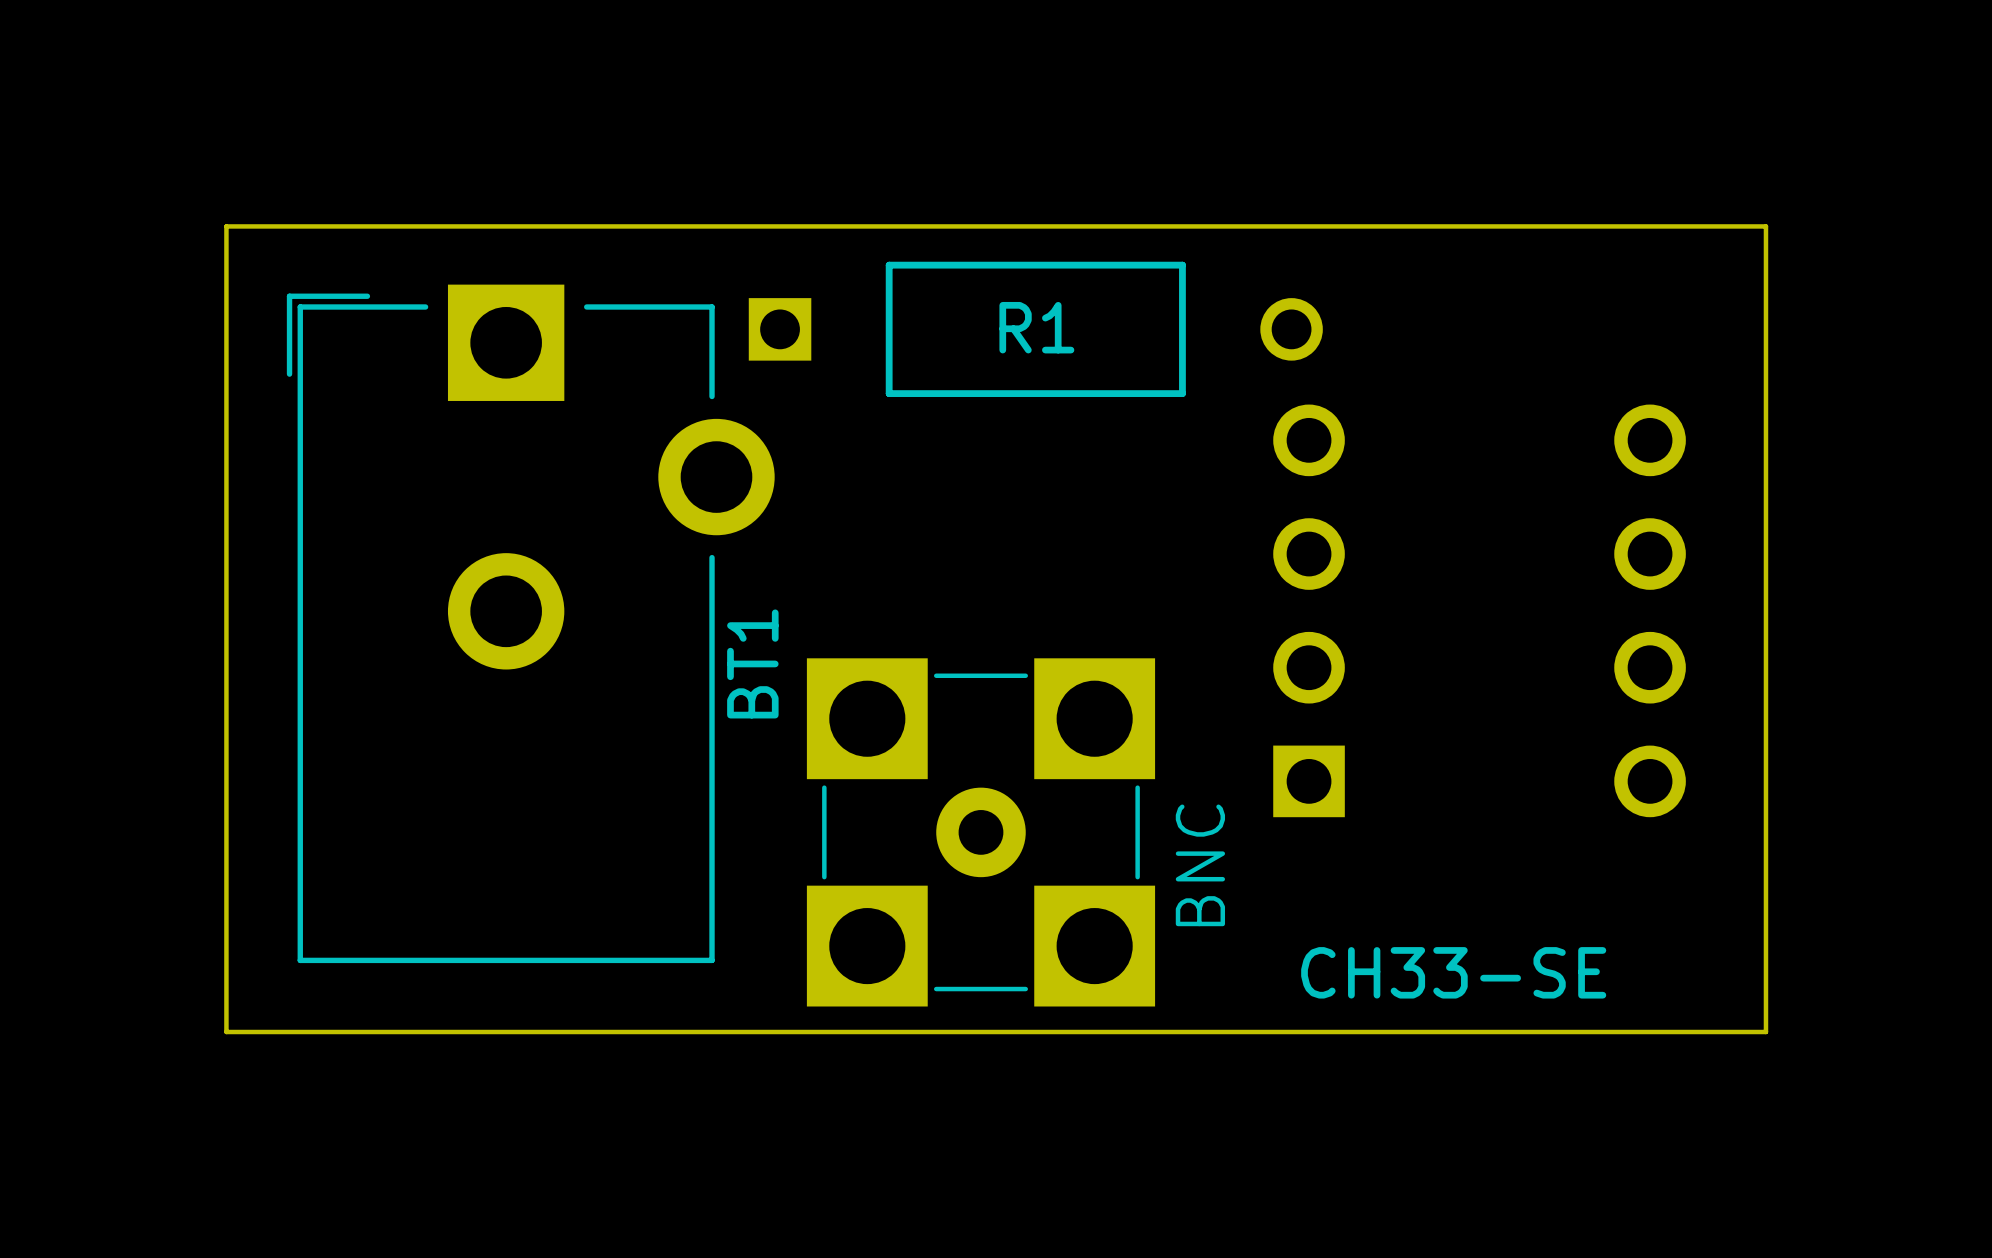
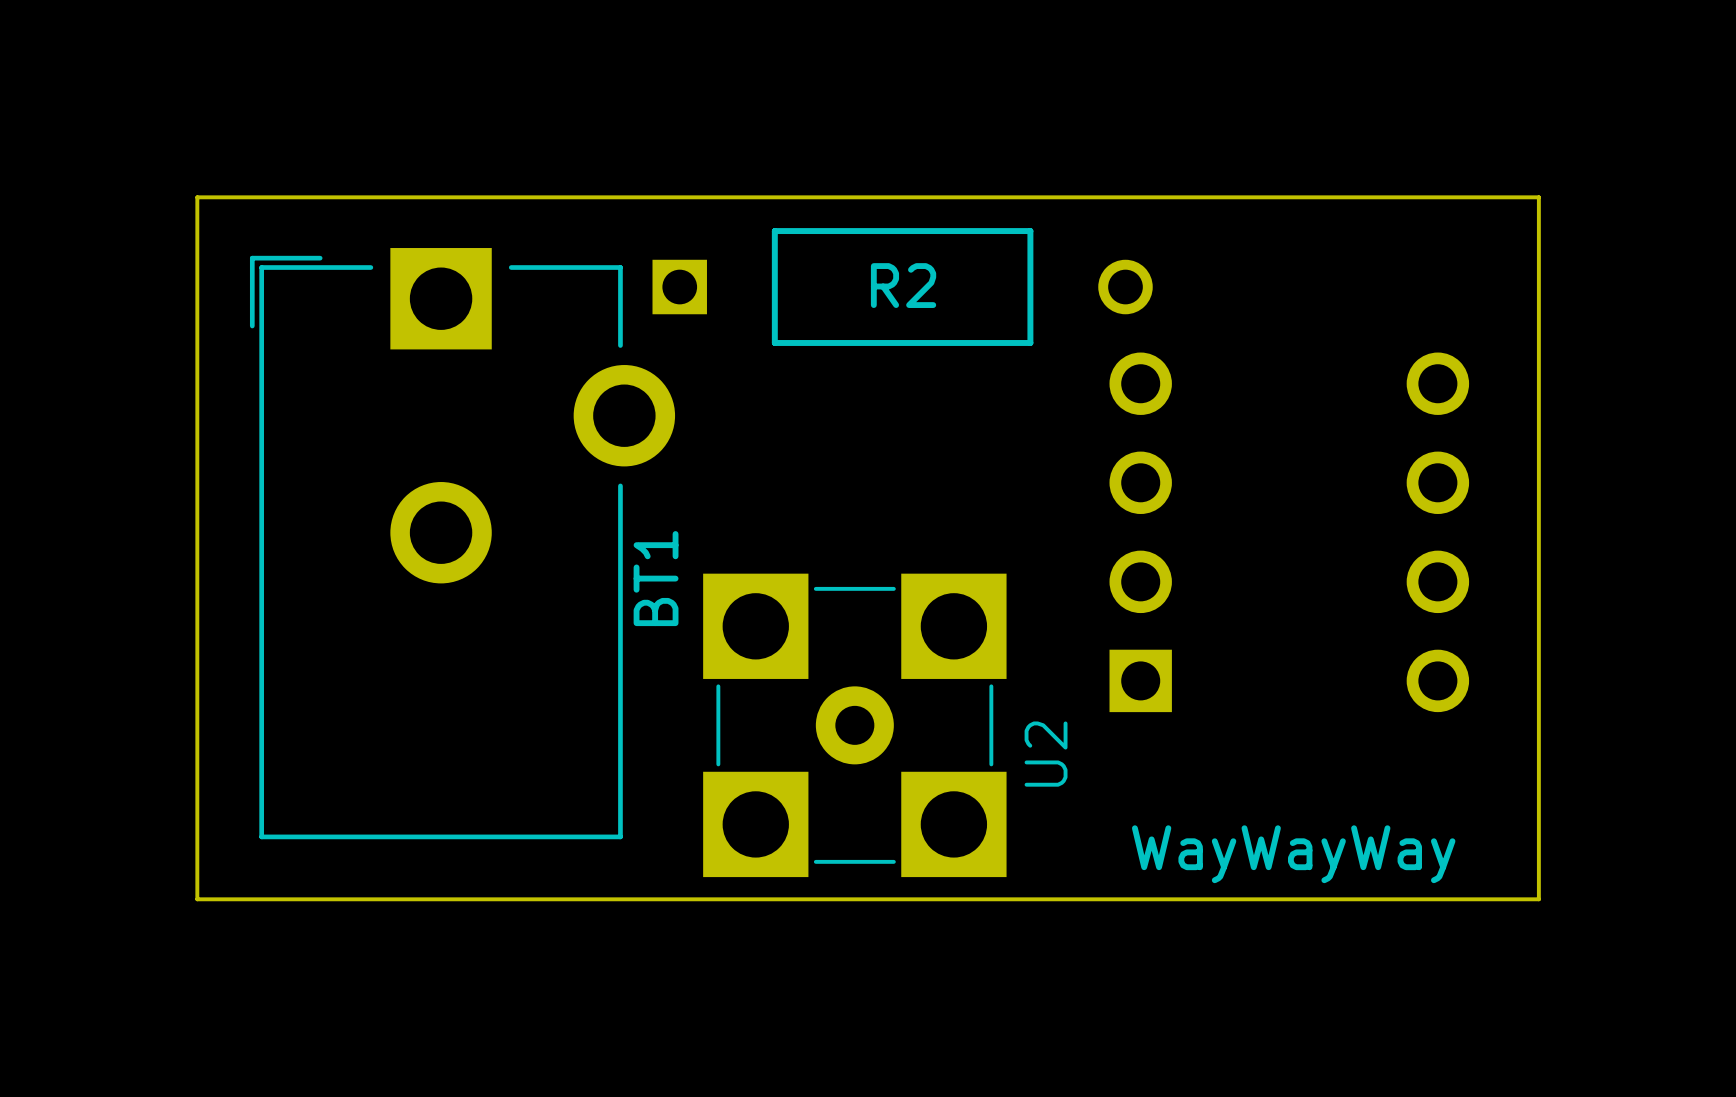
R1 name: R1 (1036, 327) -> R2 (903, 285)
BNC name: BNC (1200, 865) -> U2 (1046, 754)
text: CH33-SE (1453, 972) -> WayWayWay (1293, 854)

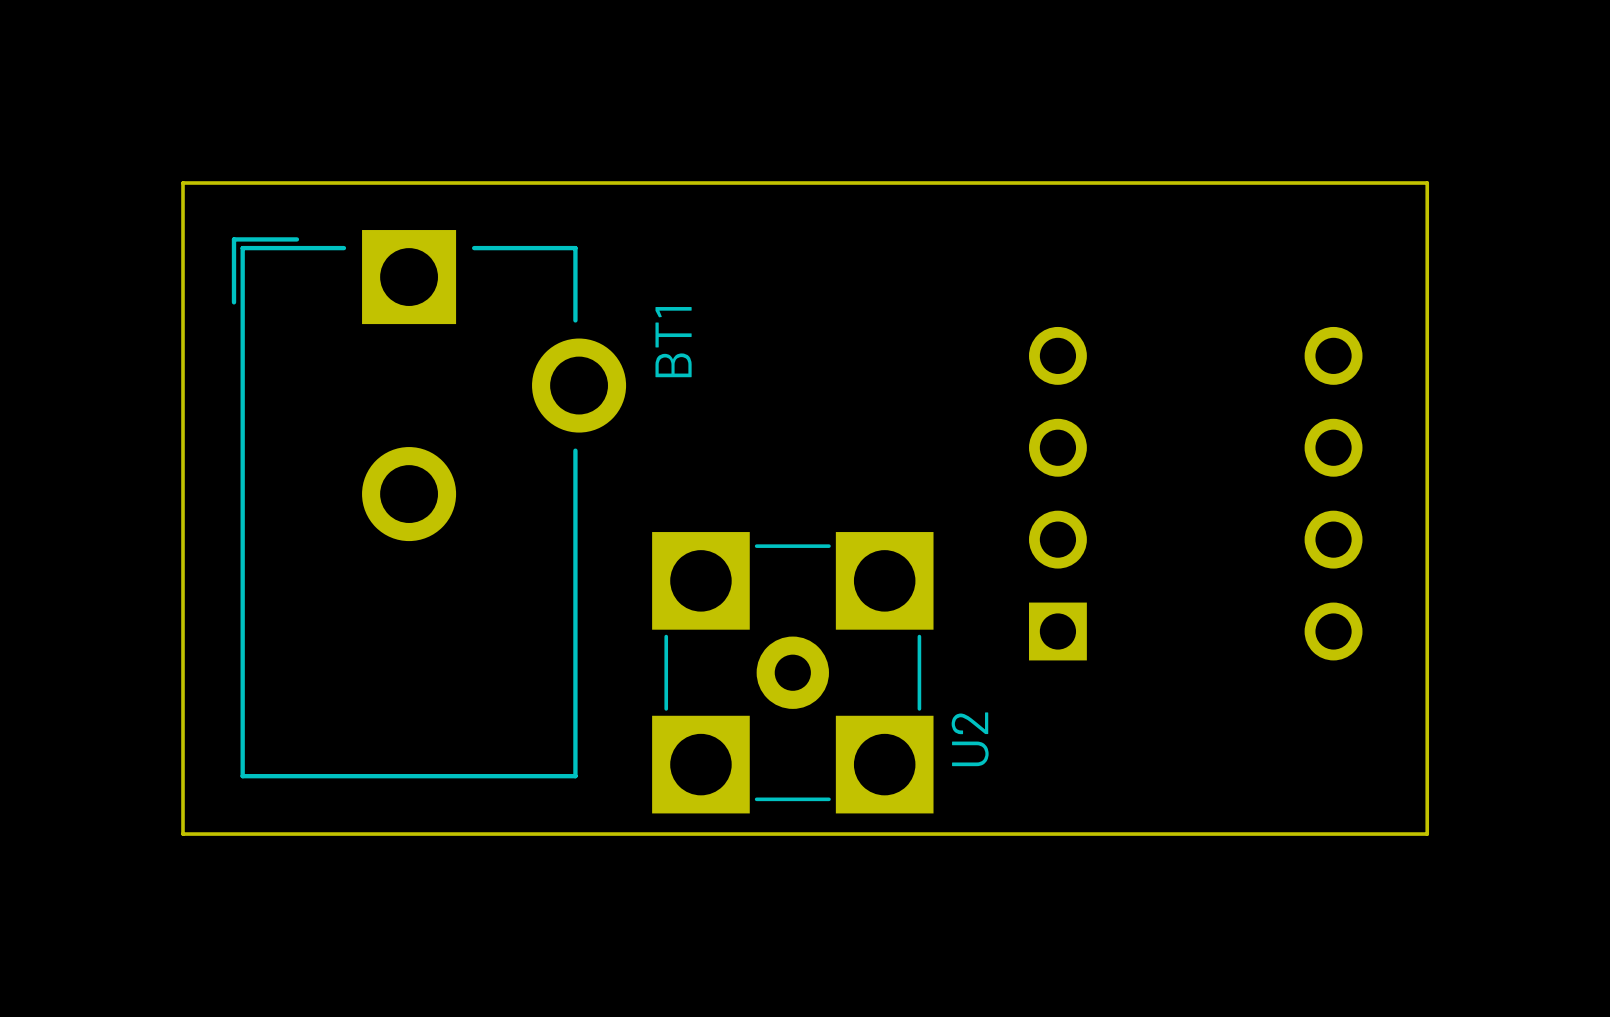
R2: (902, 287) -> none
BT1 name position: BT1 (656, 578) -> BT1 (673, 342)
U2 name position: U2 (1046, 754) -> U2 (970, 739)
text: WayWayWay (1293, 854) -> none

